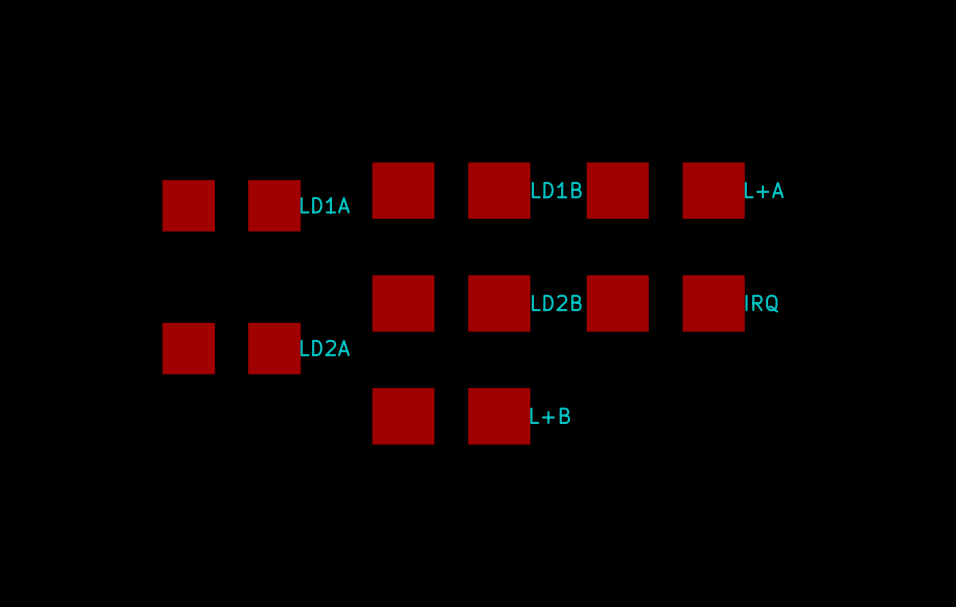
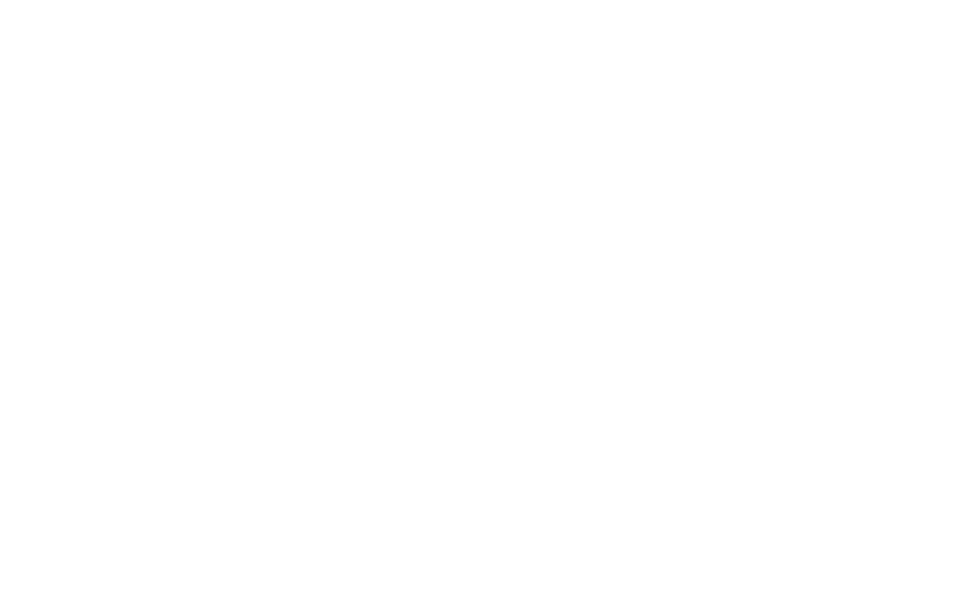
part: LD1B (451, 190) -> none
part: L+A (665, 190) -> none
part: LD1A (231, 205) -> none
part: LD2B (451, 303) -> none
part: IRQ (665, 303) -> none
part: LD2A (231, 348) -> none
part: L+B (451, 416) -> none

